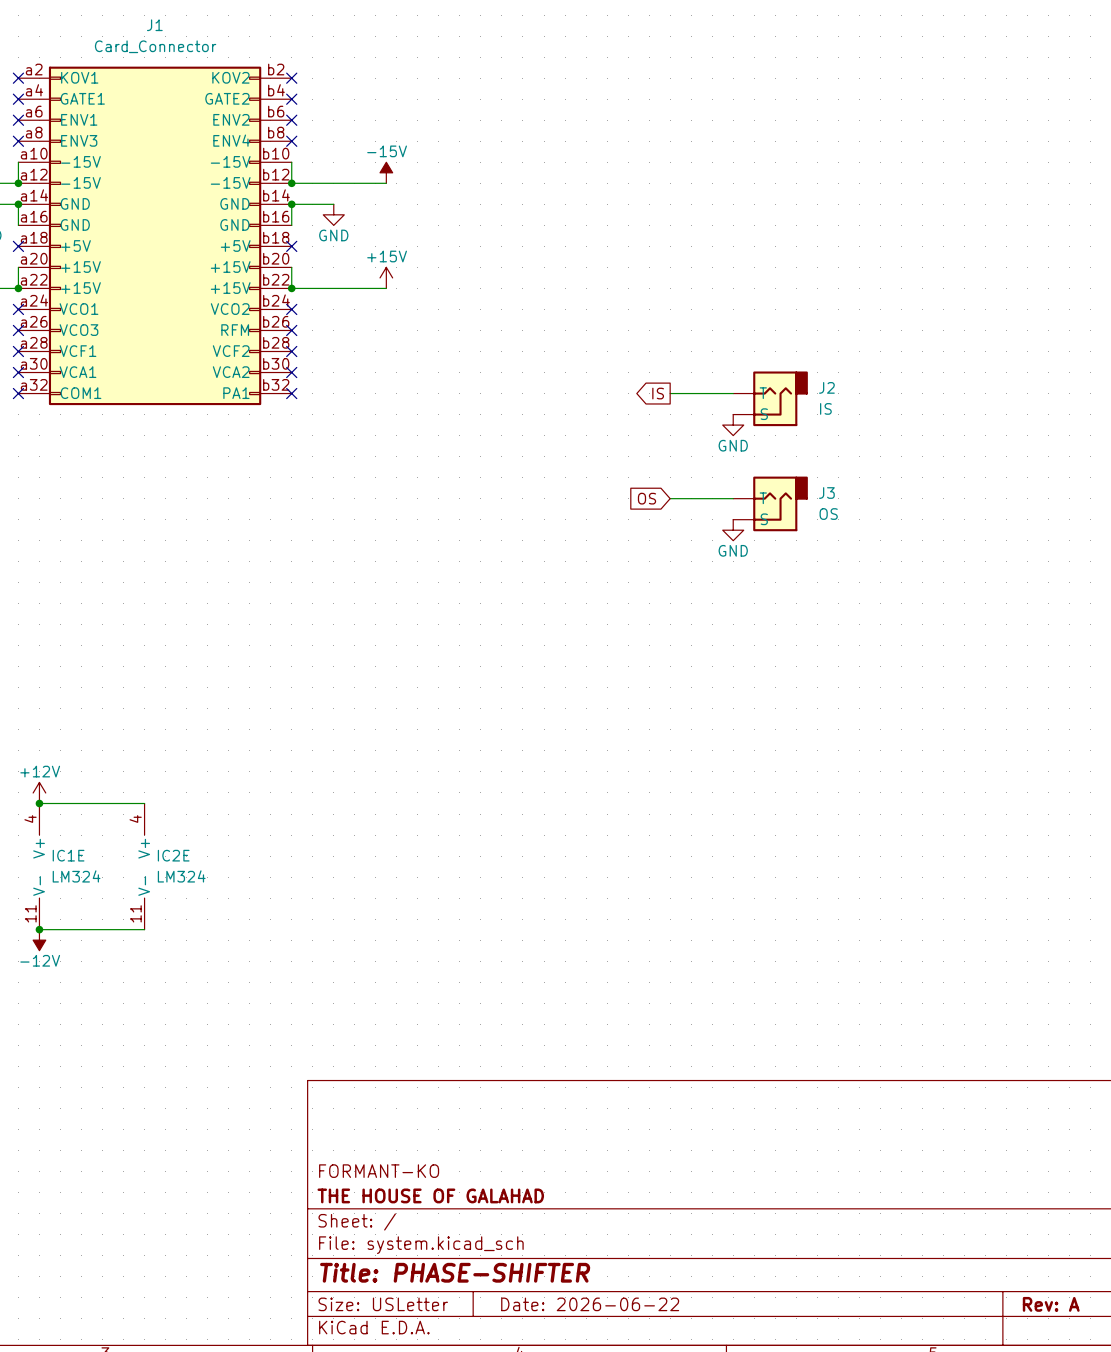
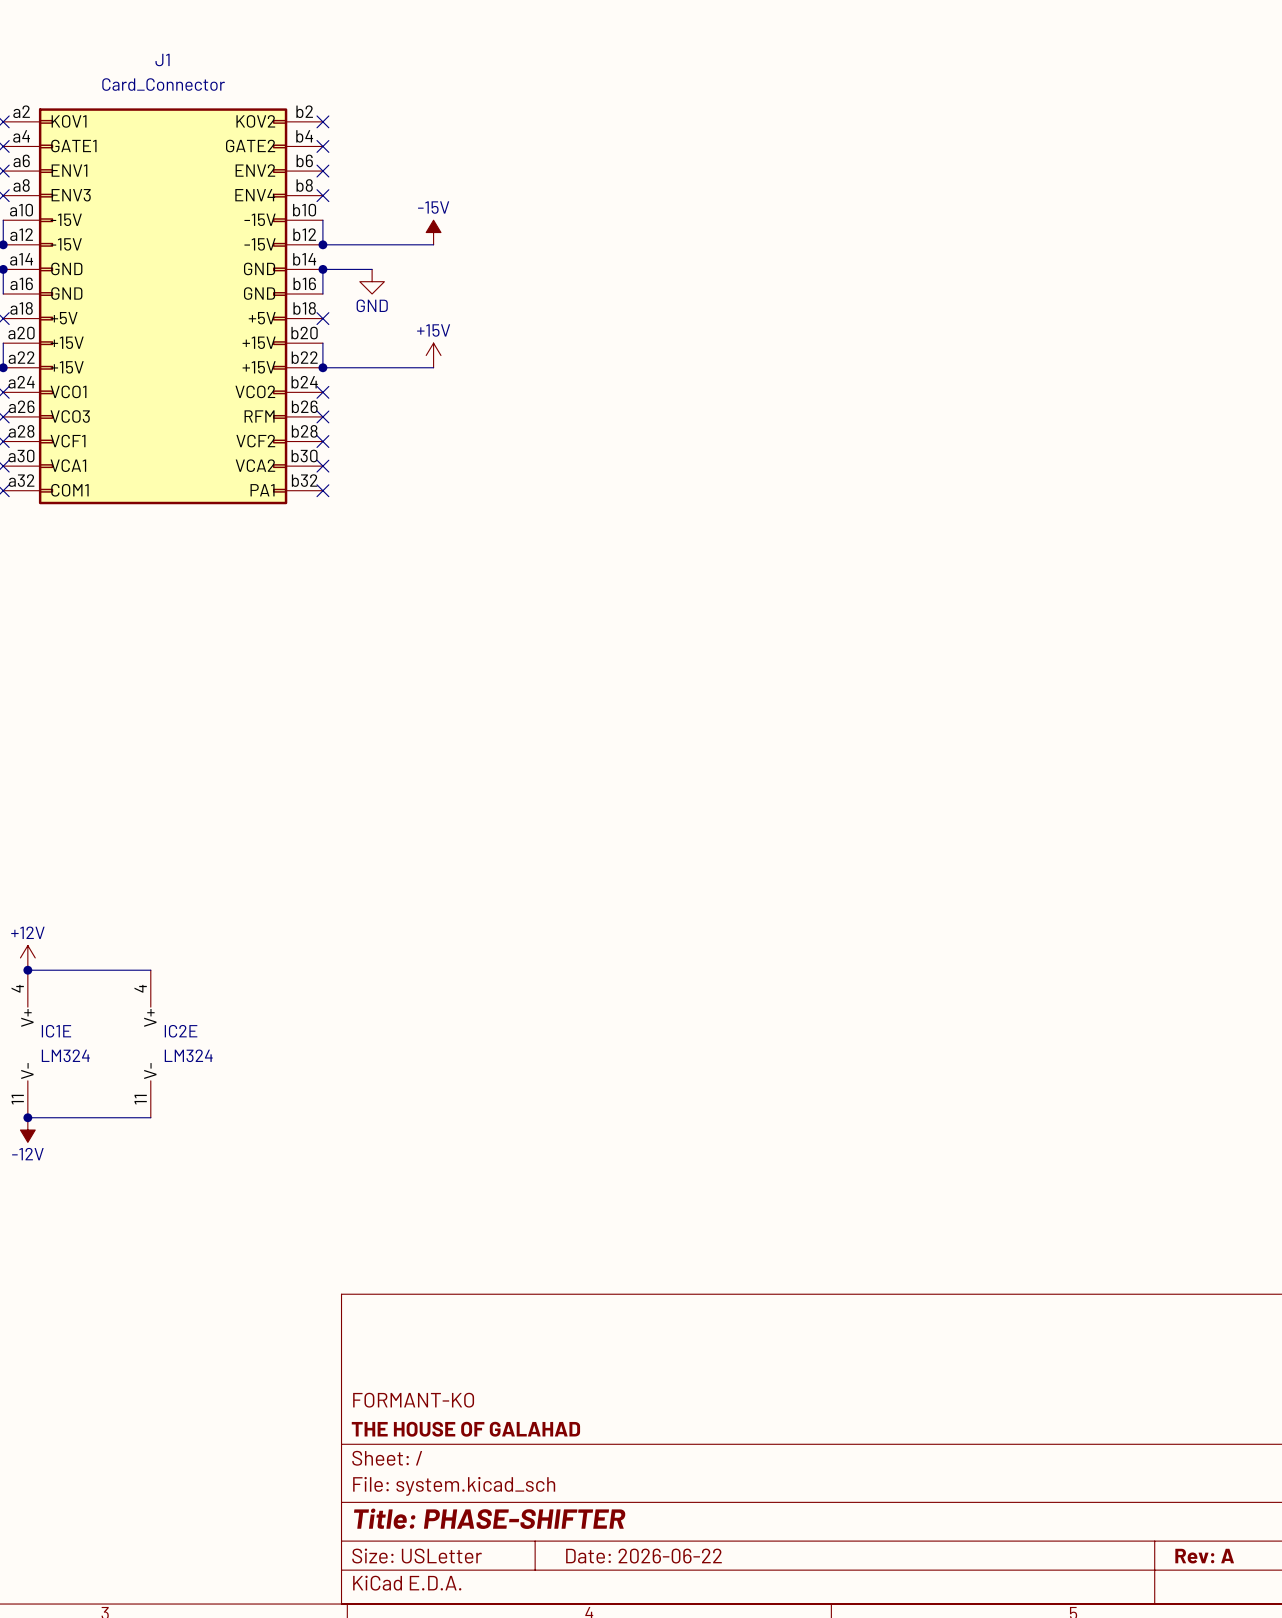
global label: IS (658, 393) -> none
wire: (670, 393) (733, 393) -> none
J2: IS (770, 398) -> none
power symbol: GND (733, 425) -> none
global label: OS (646, 498) -> none
wire: (670, 498) (733, 498) -> none
J3: OS (770, 503) -> none
power symbol: GND (733, 530) -> none

